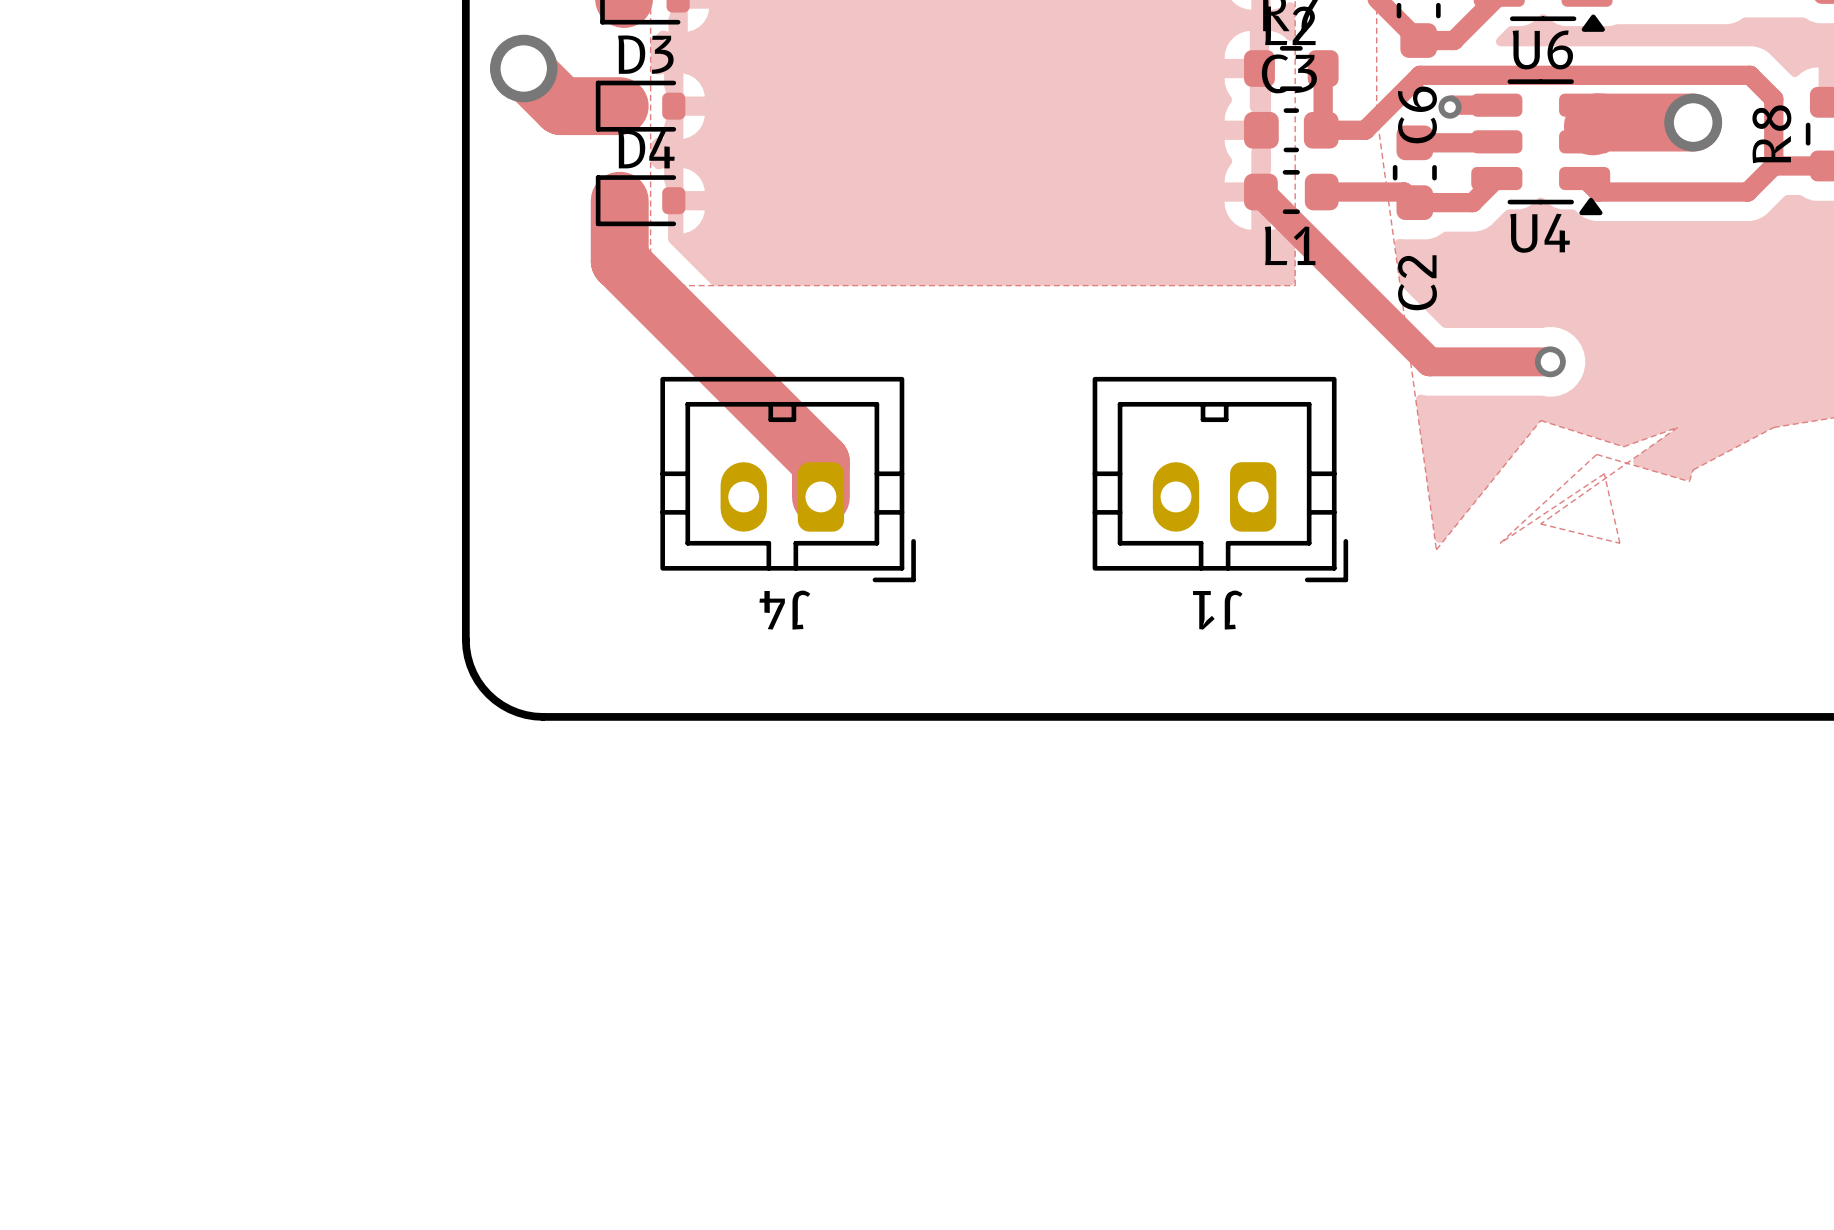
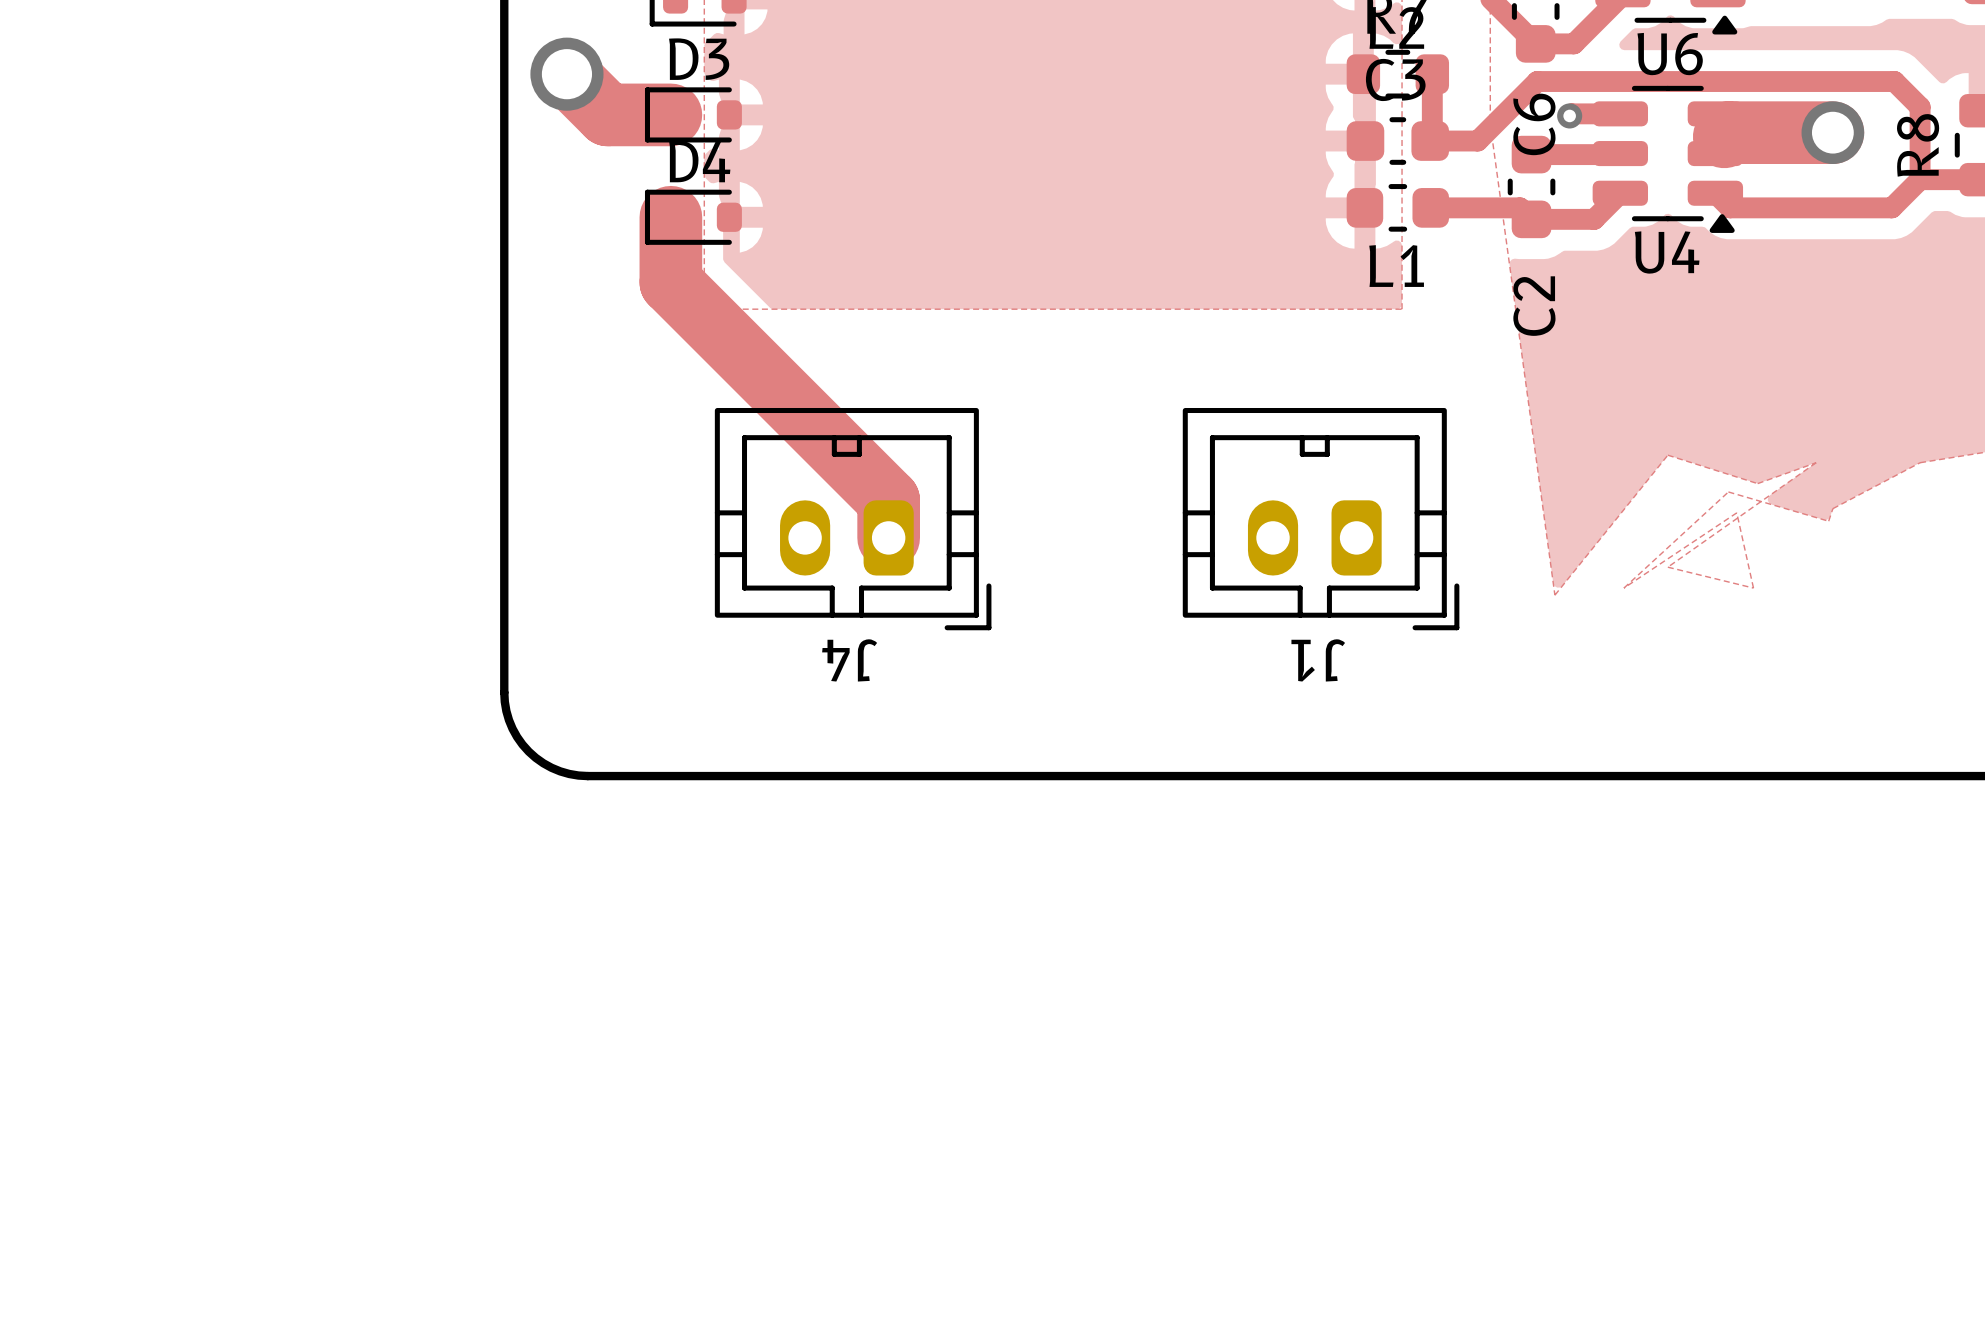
track: (1260, 192) (1429, 361) (1550, 361) -> none
via: (1550, 361) -> none

